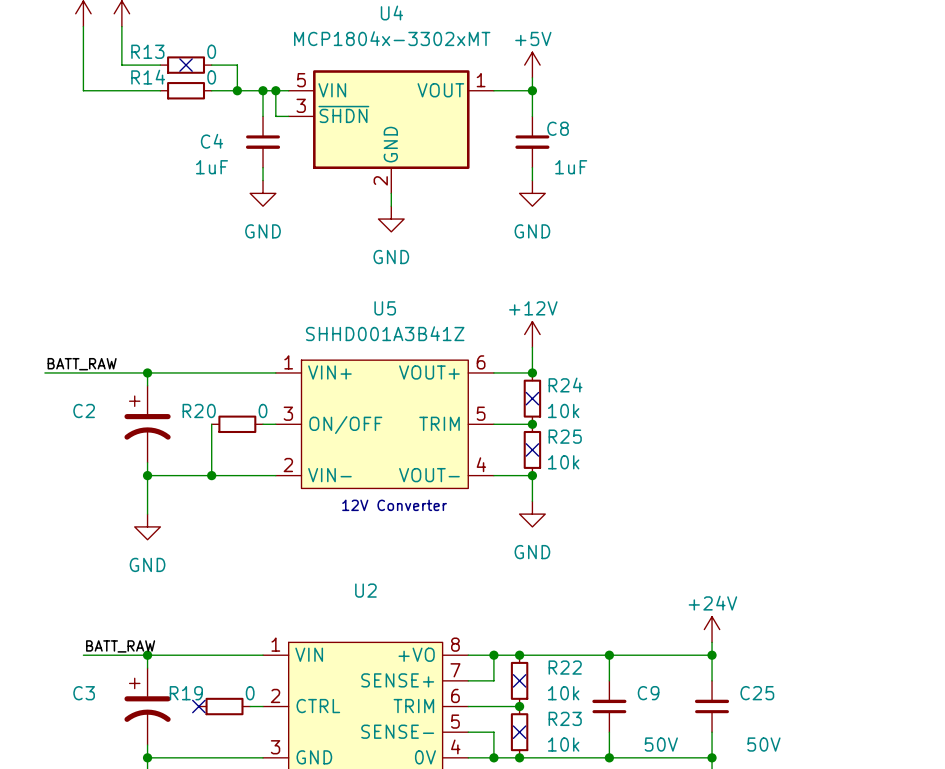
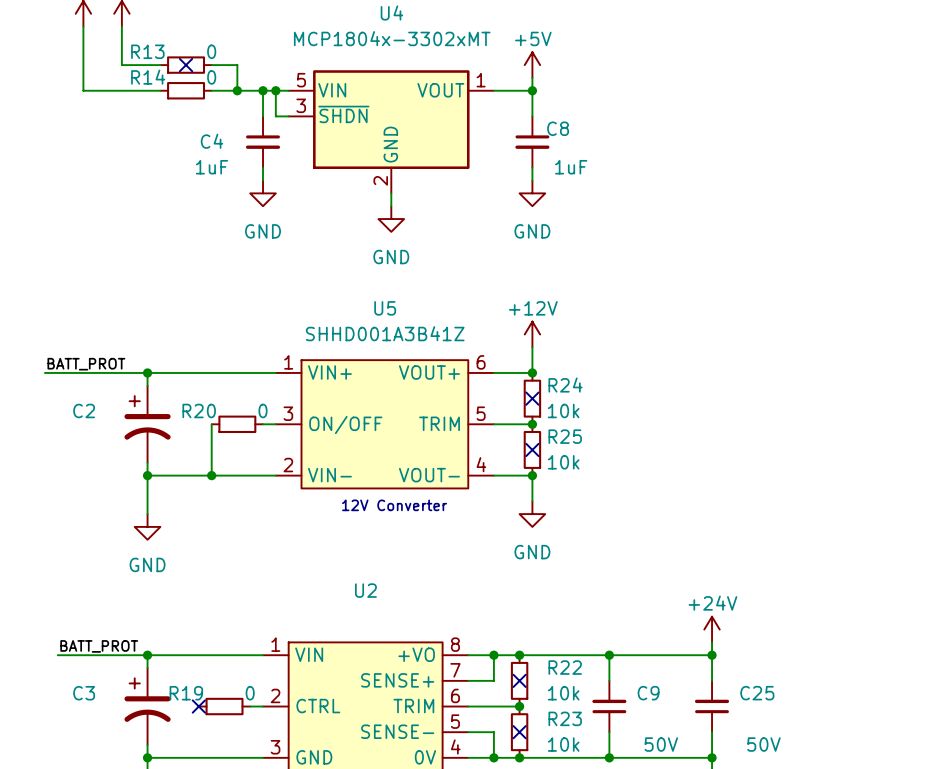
label: BATT_RAW (82, 364) -> BATT_PROT (86, 364)
label: BATT_RAW (120, 646) -> BATT_PROT (99, 646)
wire: none -> (57, 655) (83, 655)

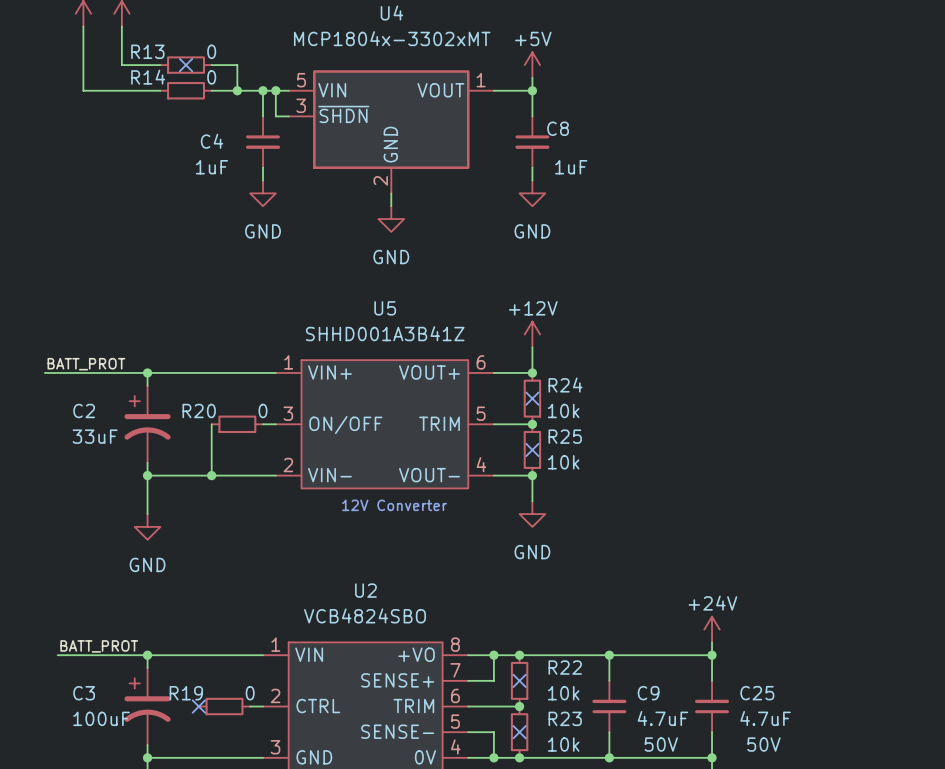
C2 value: none -> 33uF (95, 436)
U2 value: none -> VCB4824SBO (365, 615)
C3 value: none -> 100uF (101, 718)
C9 value: none -> 4.7uF (662, 718)
C25 value: none -> 4.7uF (765, 718)

